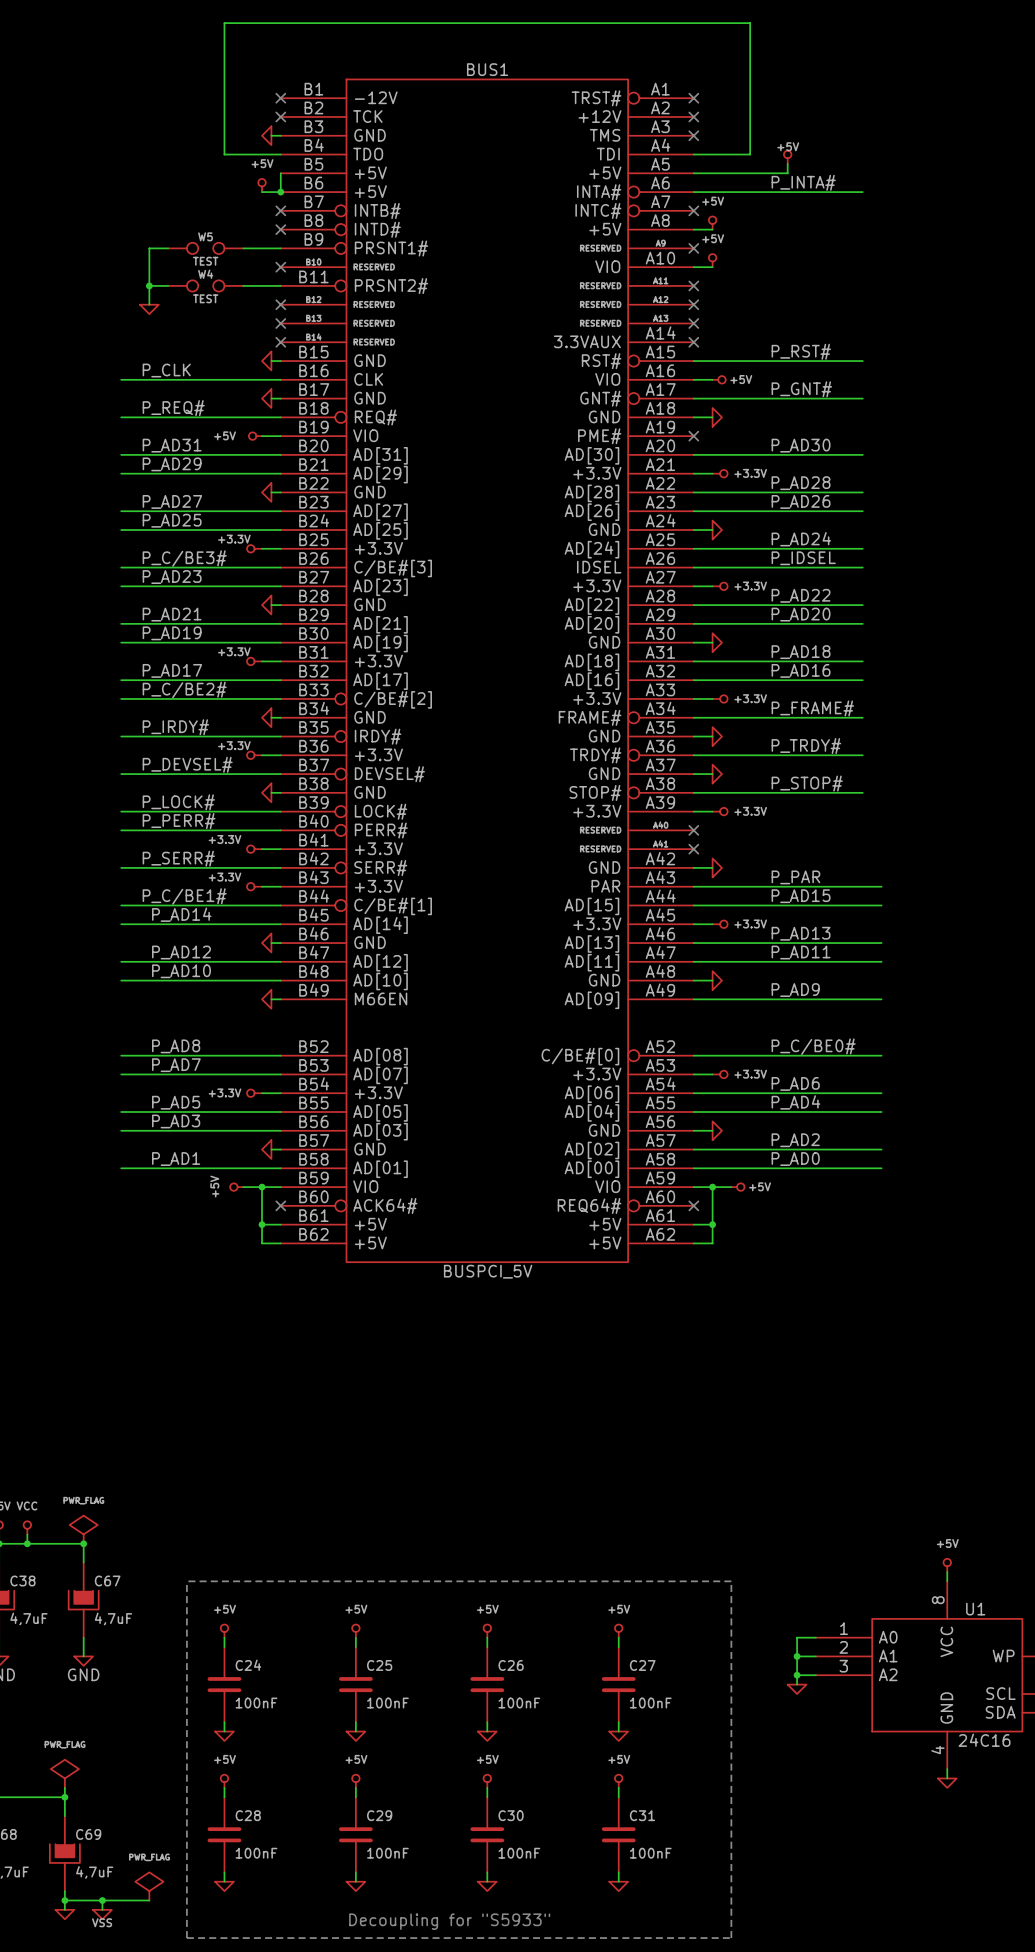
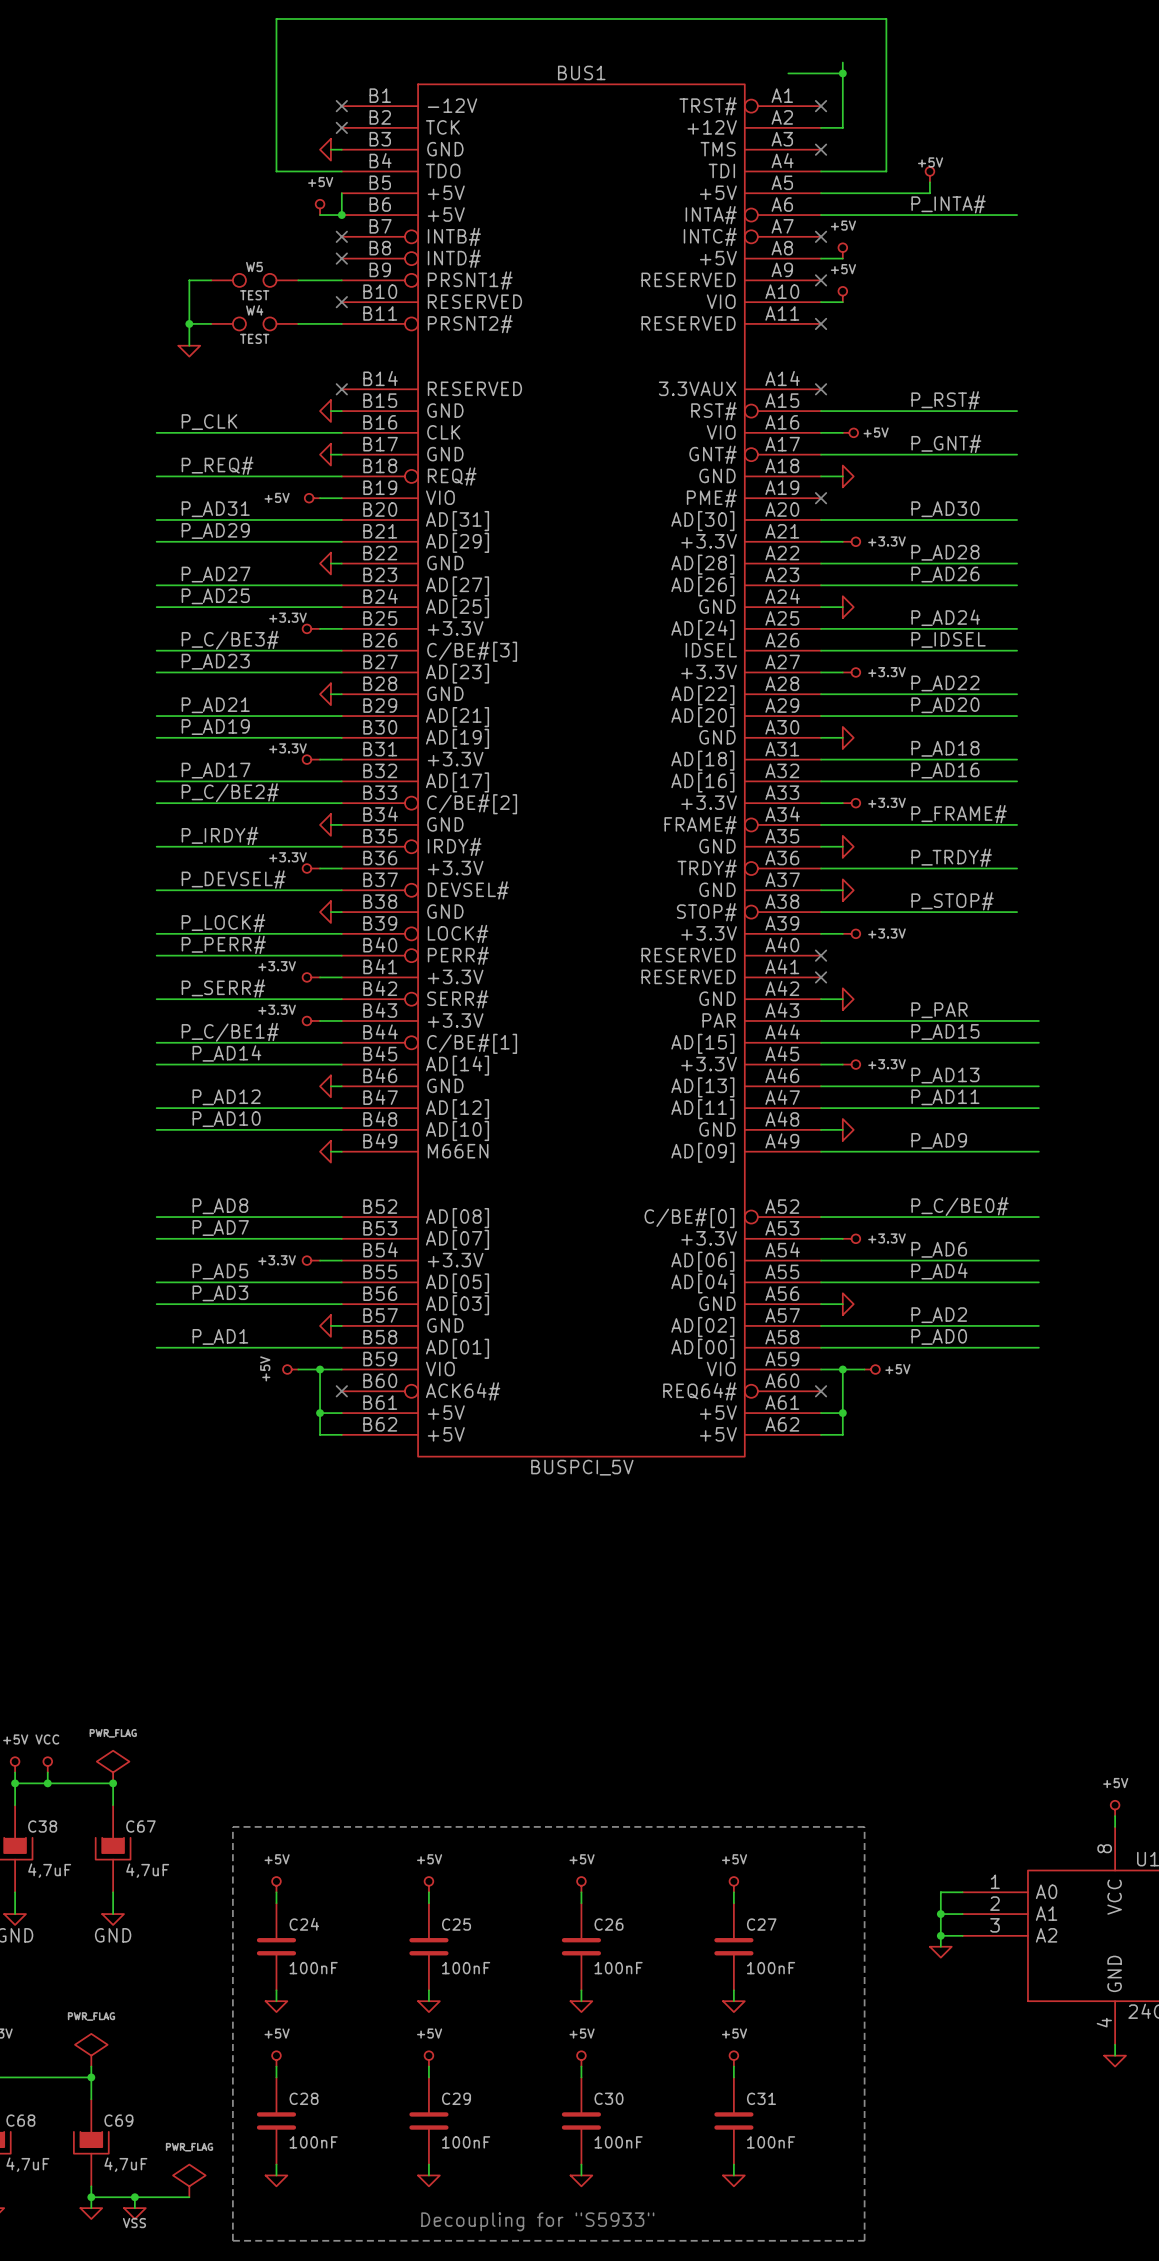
wire: none -> (842, 62) (842, 127) (821, 127)
wire: none -> (788, 73) (842, 73)
junction: none -> (842, 73)
BUS1 symbol: [280, 79, 694, 1263] -> [341, 84, 822, 1457]
no-connect mark: (693, 116) -> none
no-connect mark: (280, 304) -> none
no-connect mark: (693, 304) -> none
no-connect mark: (280, 323) -> none
no-connect mark: (693, 323) -> none

